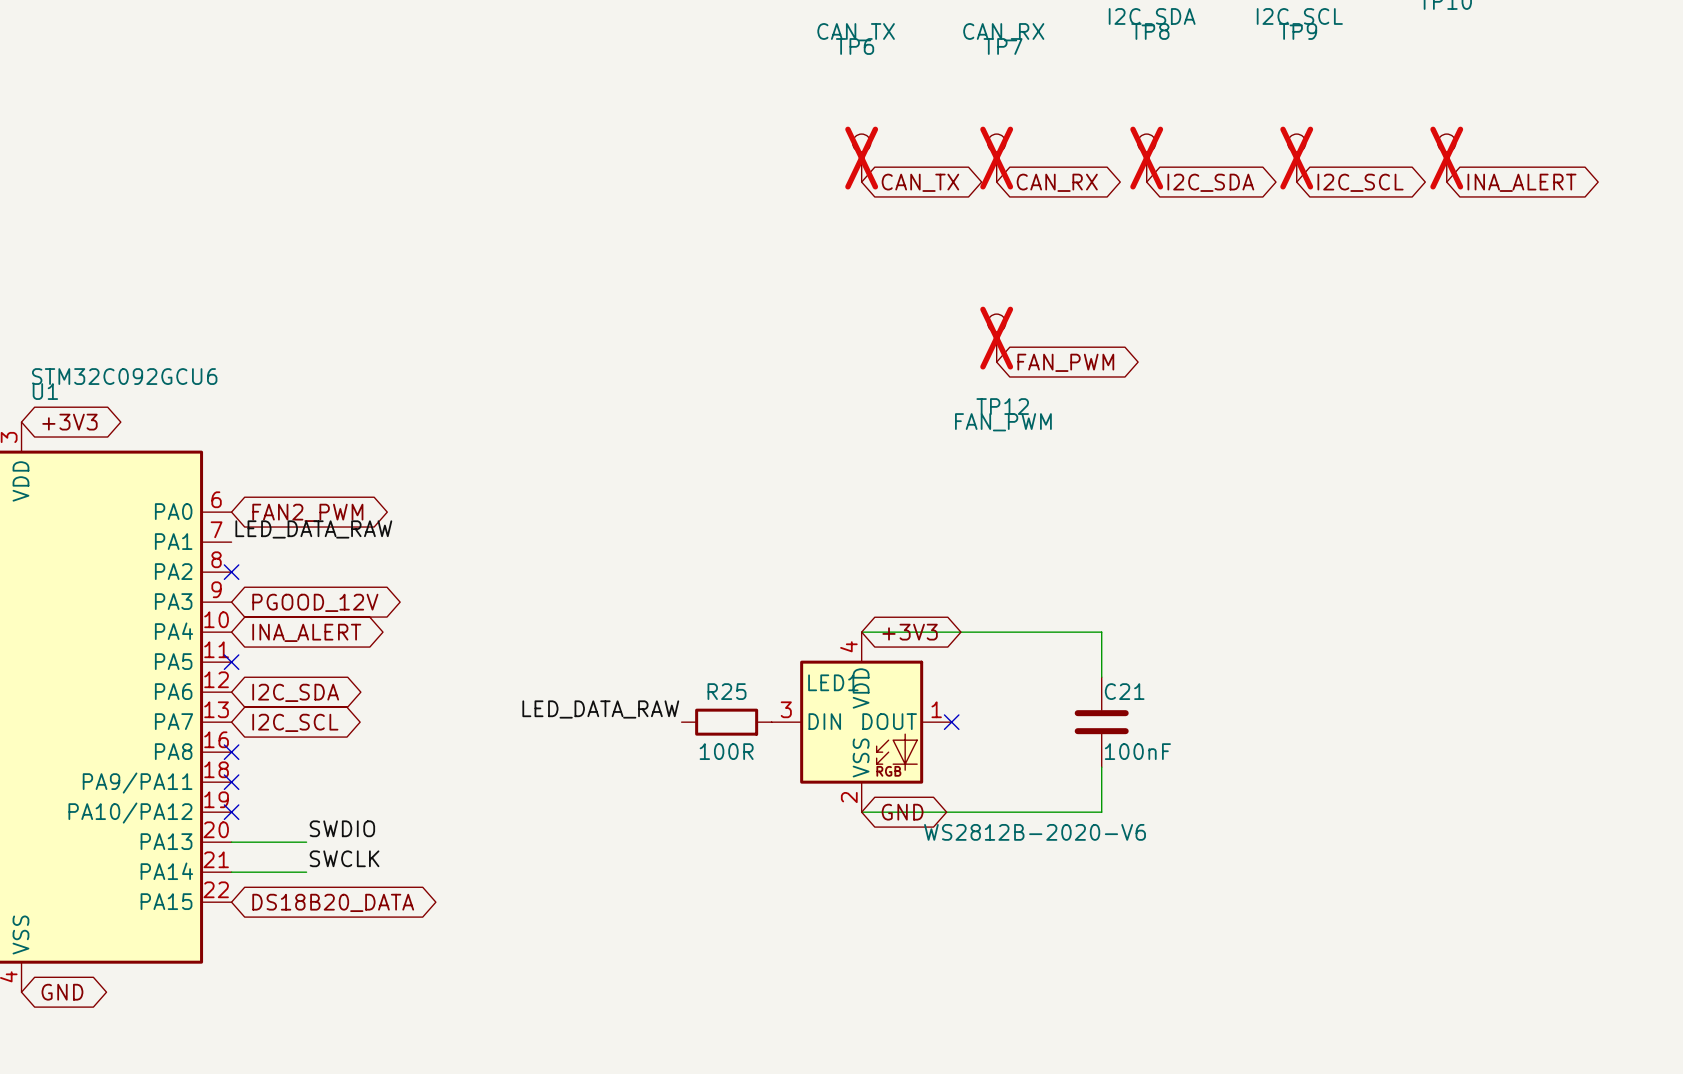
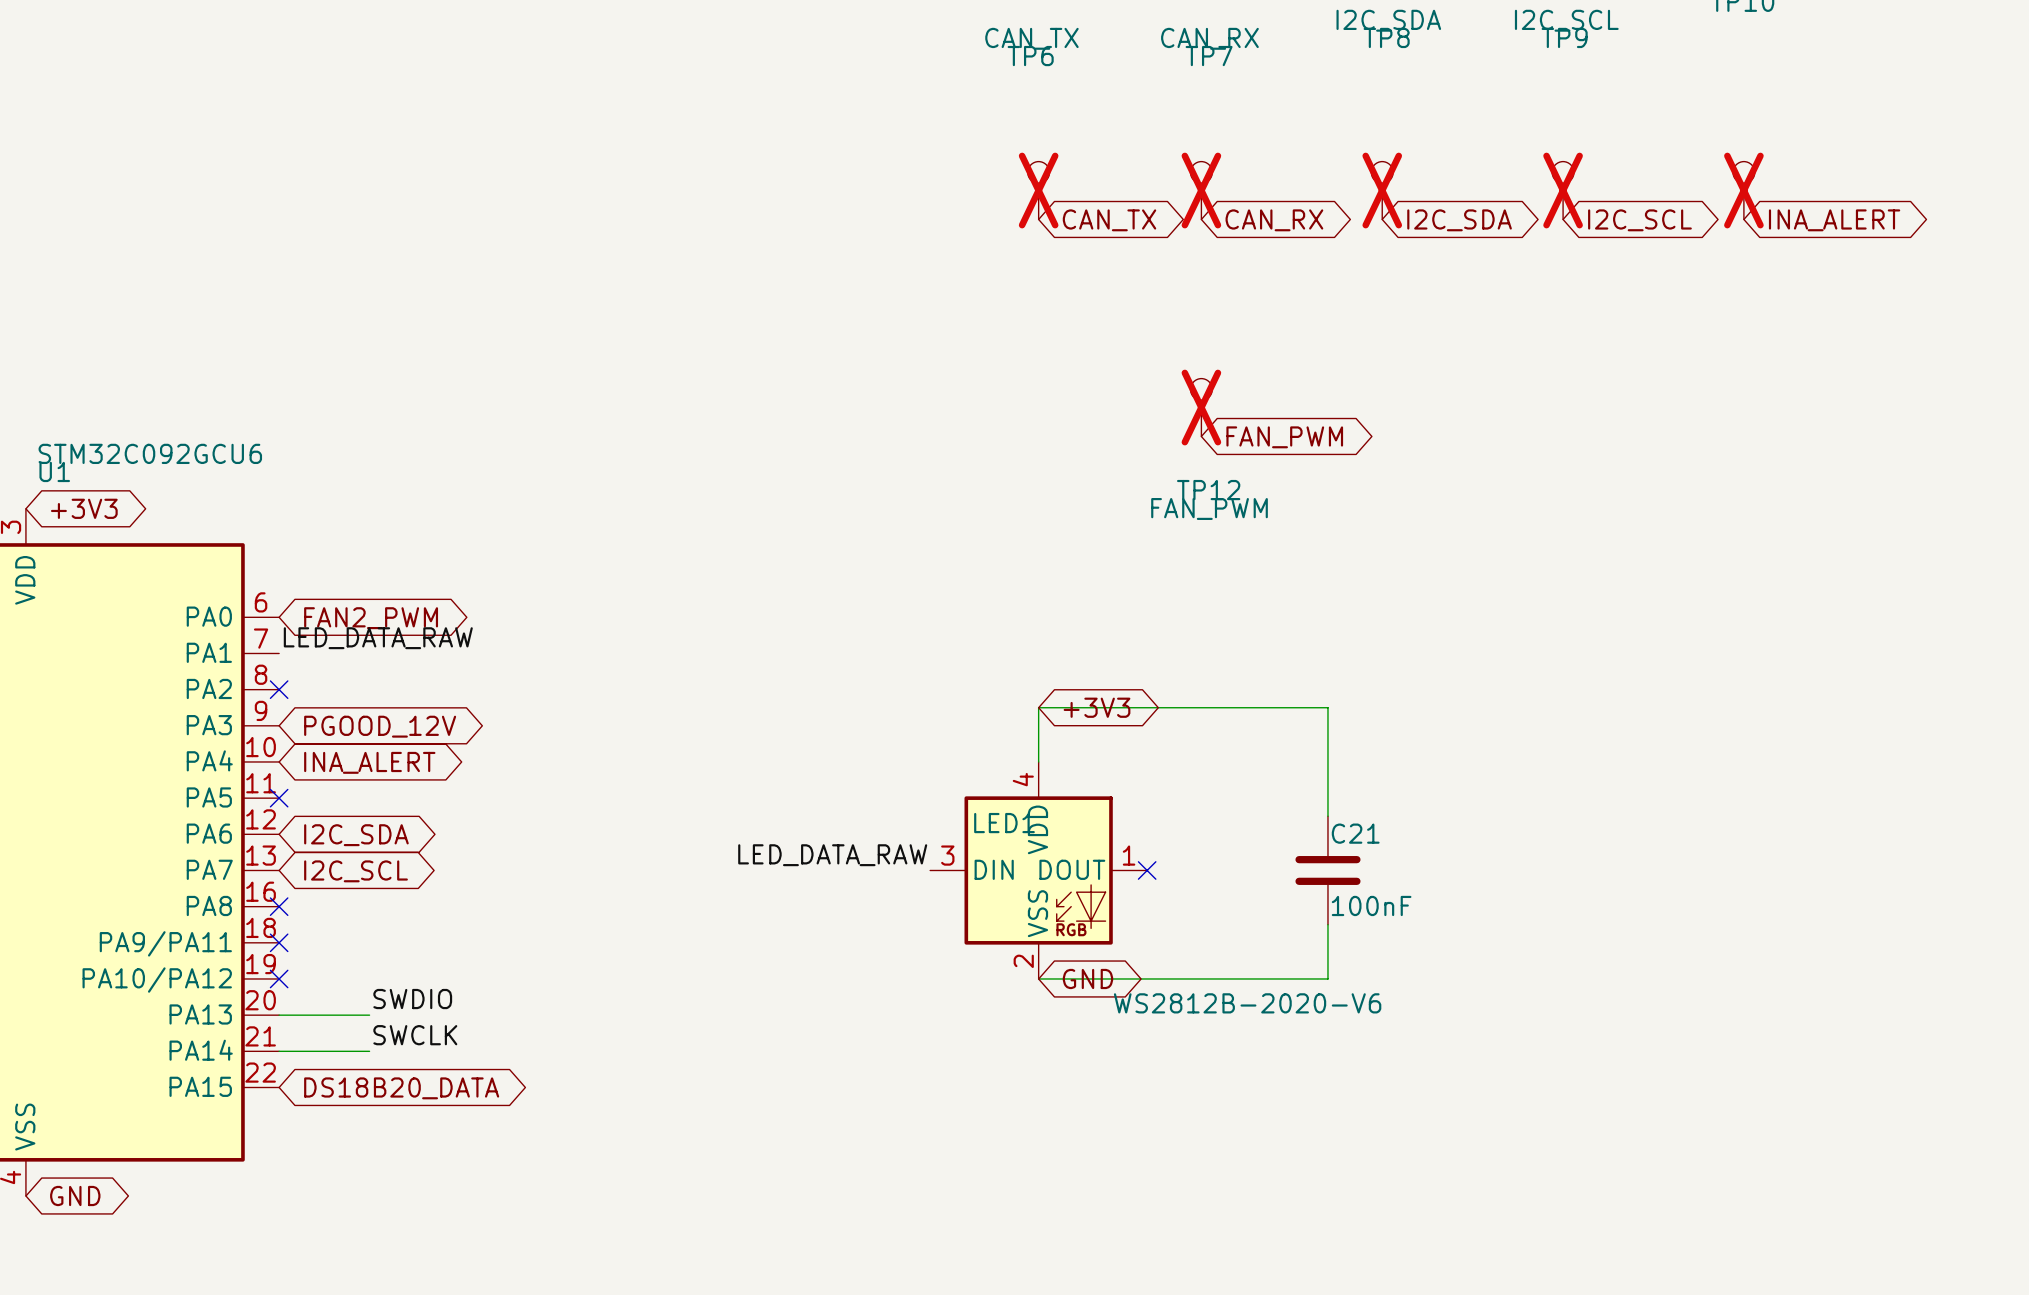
wire: (861, 632) (1101, 632) -> (1038, 761) (1038, 707) (1327, 707) (1327, 761)
global label position: +3V3 (910, 632) -> +3V3 (1097, 707)
label position: LED_DATA_RAW (600, 709) -> LED_DATA_RAW (832, 855)
R25: 100R (726, 722) -> none

